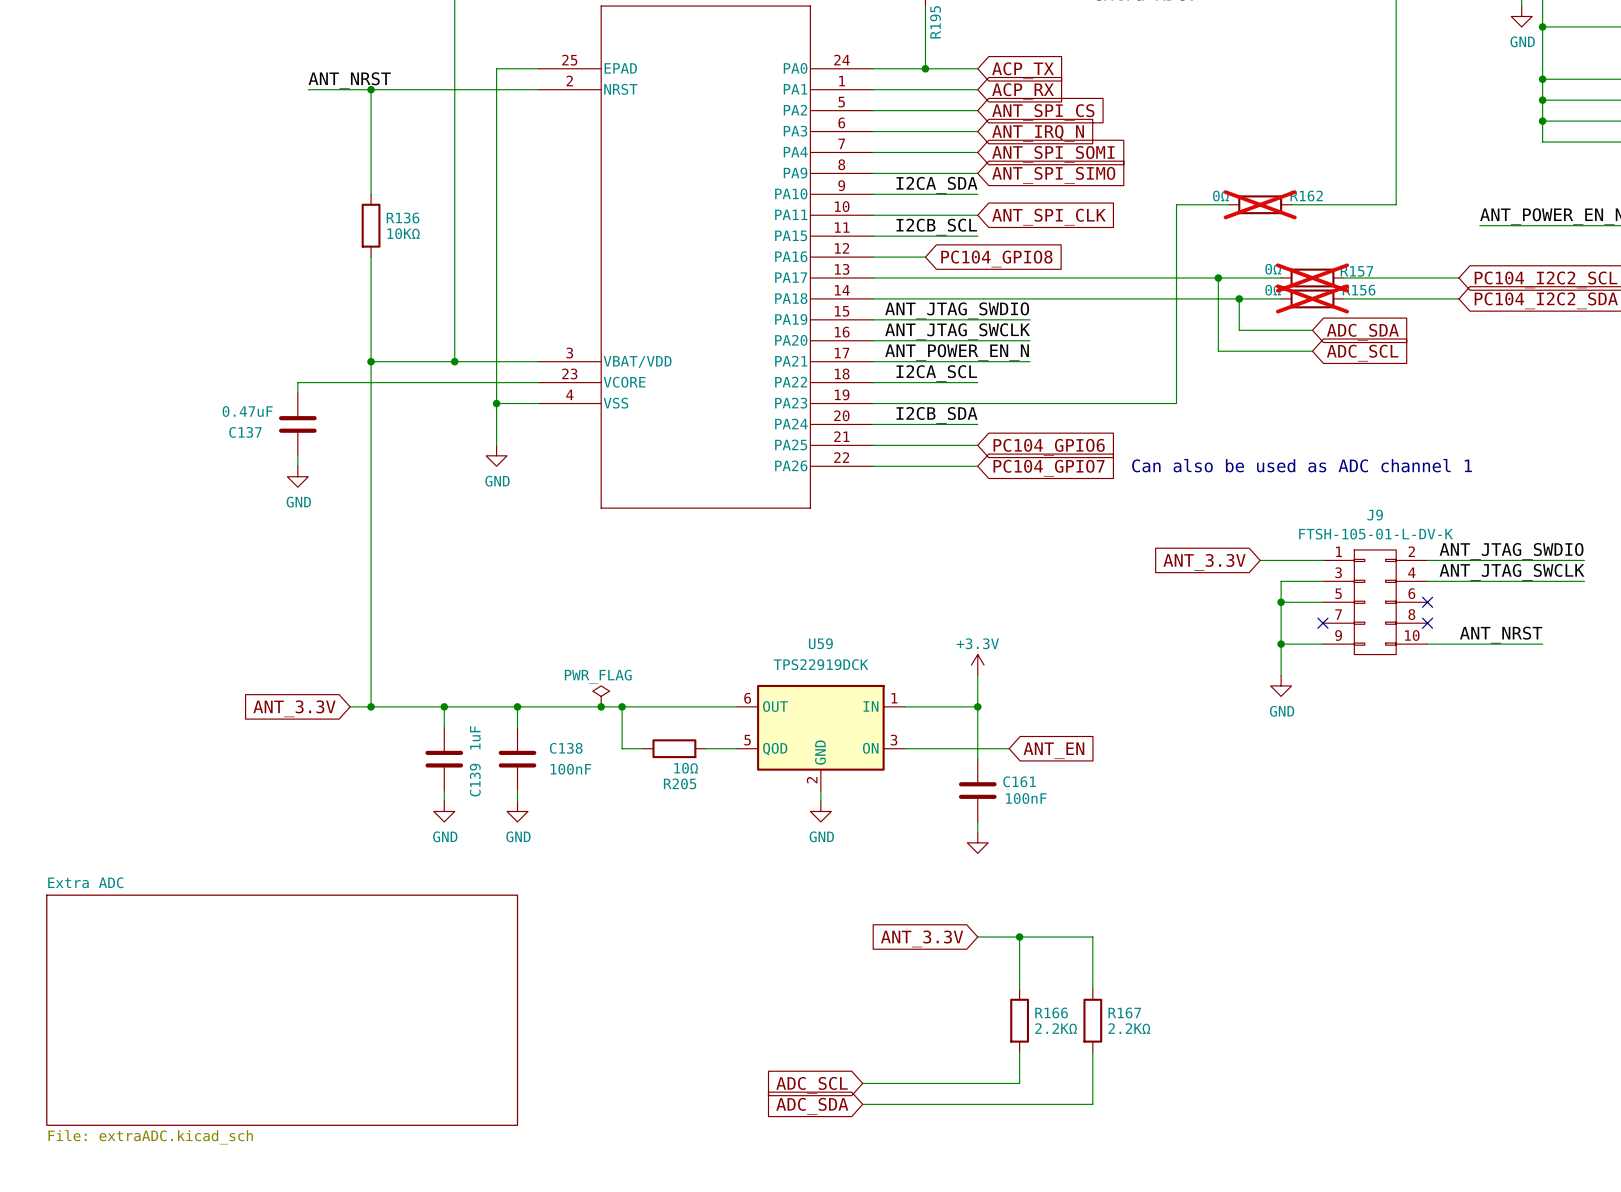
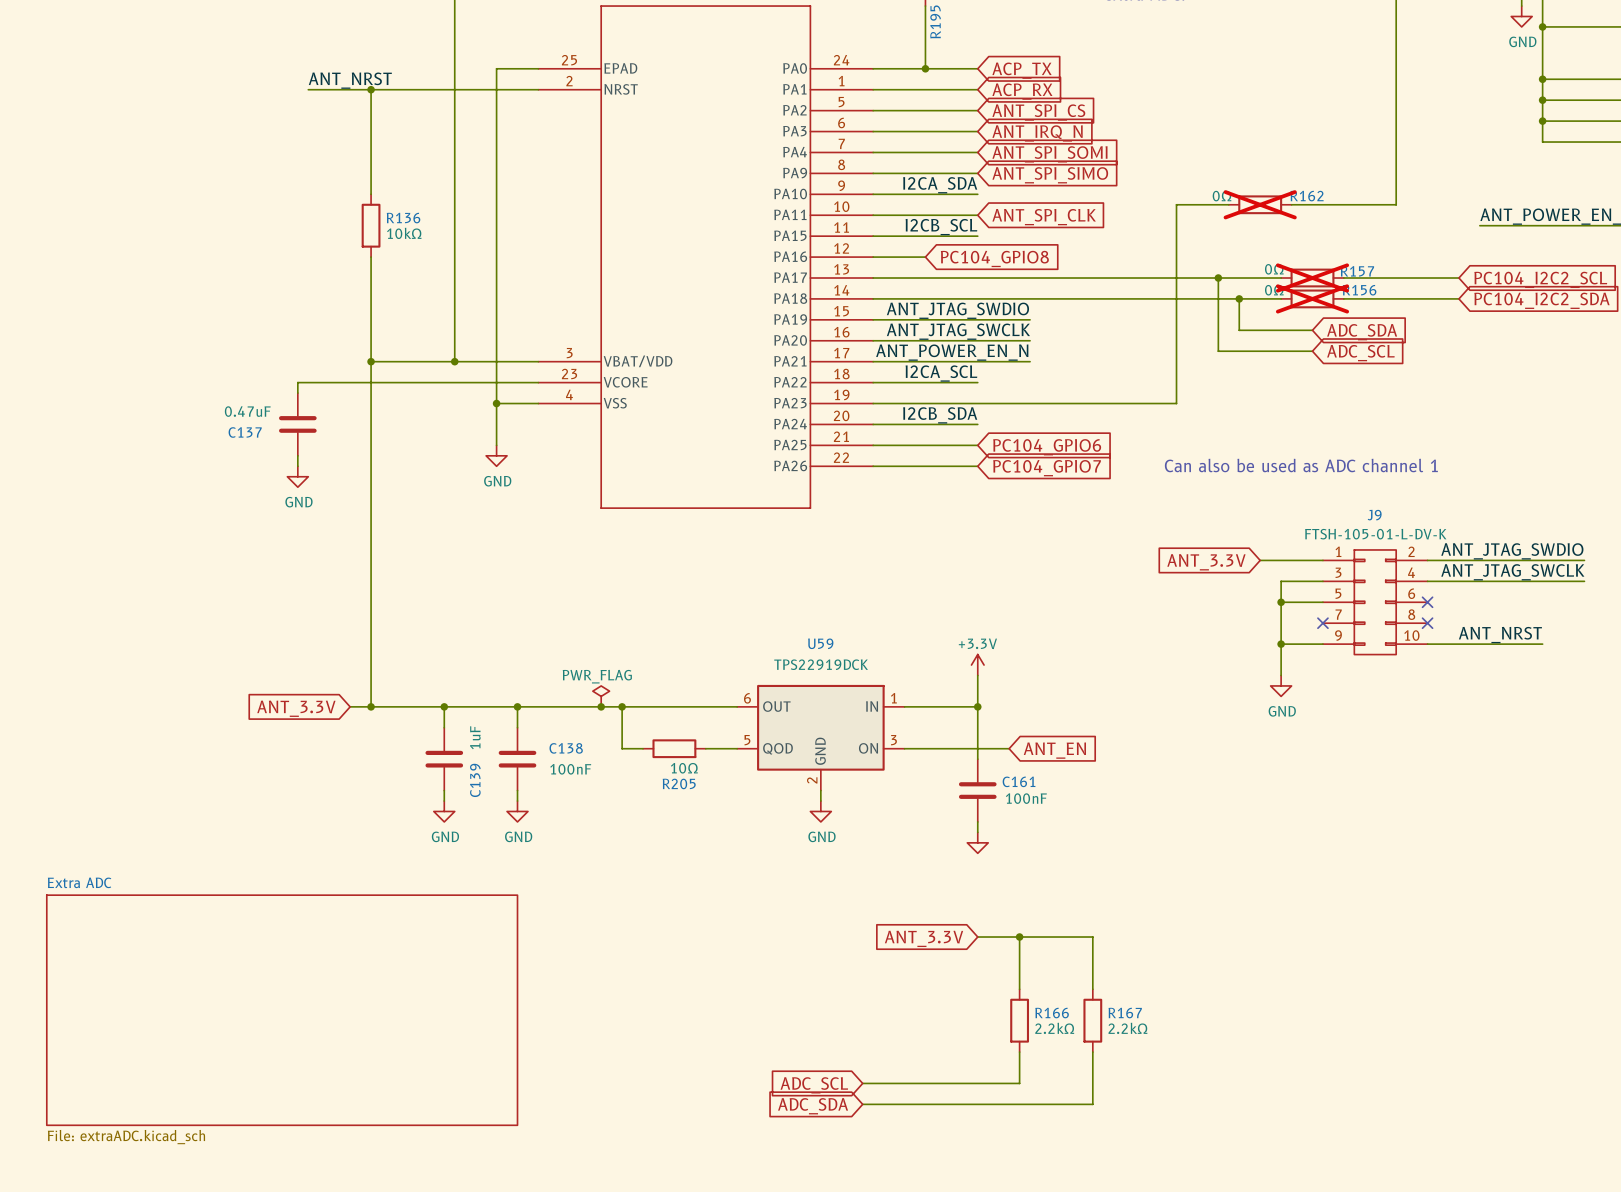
R136 value: 10KΩ (403, 233) -> 10kΩ (404, 233)
R166 value: 2.2KΩ (1056, 1028) -> 2.2kΩ (1054, 1028)
R167 value: 2.2KΩ (1129, 1028) -> 2.2kΩ (1127, 1028)

